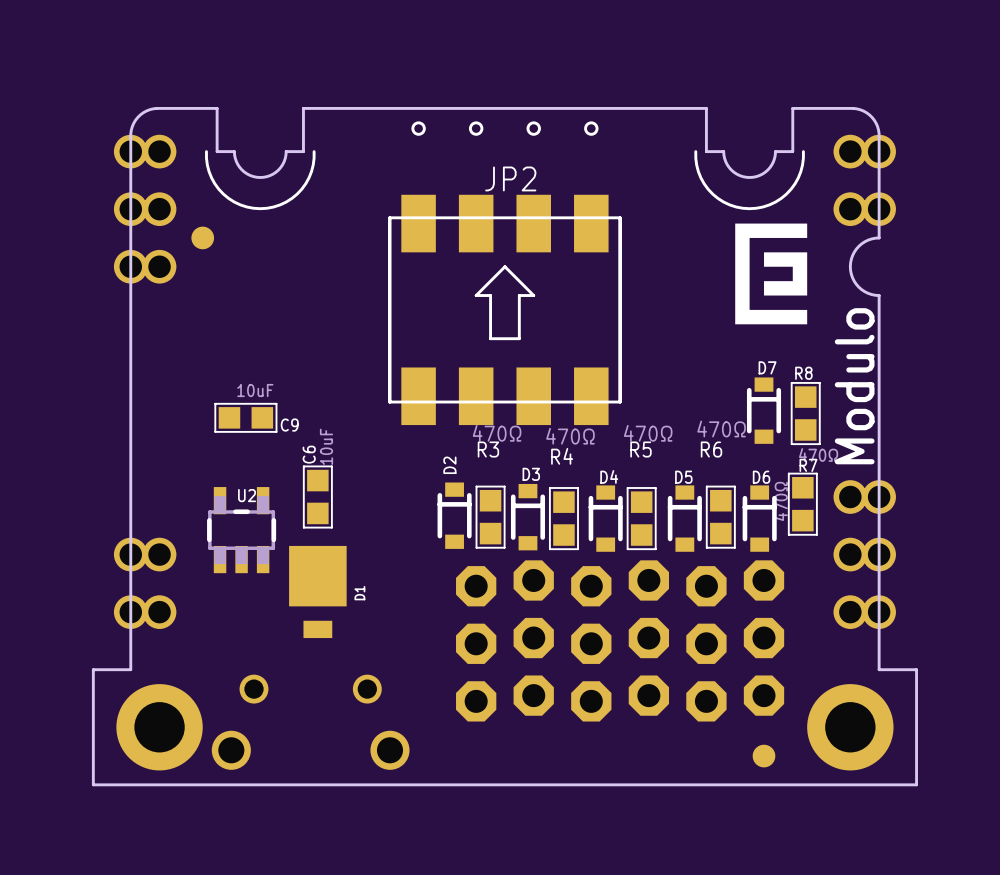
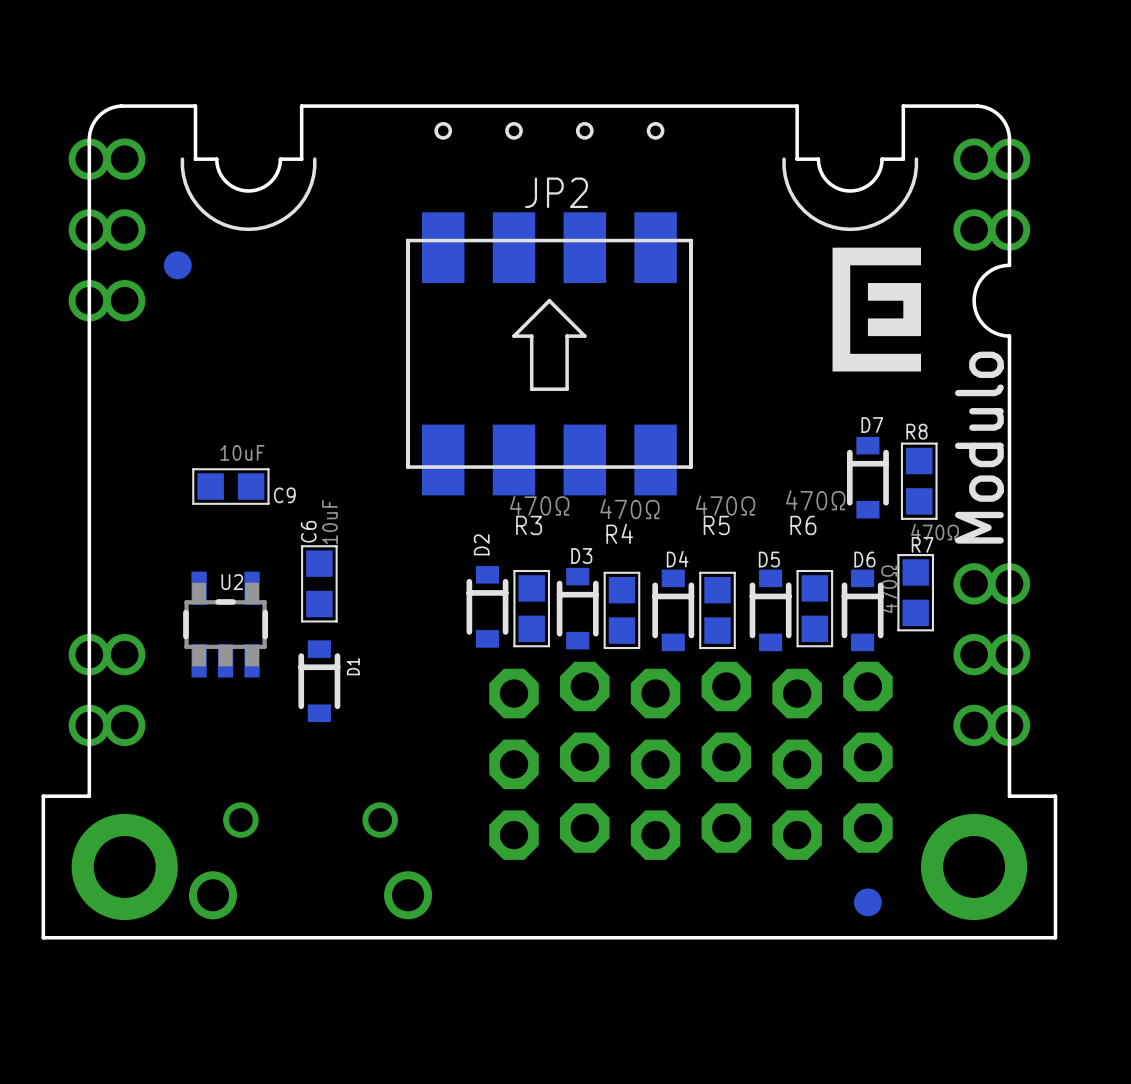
D1 footprint: [289, 545, 347, 639] -> [298, 640, 341, 723]

